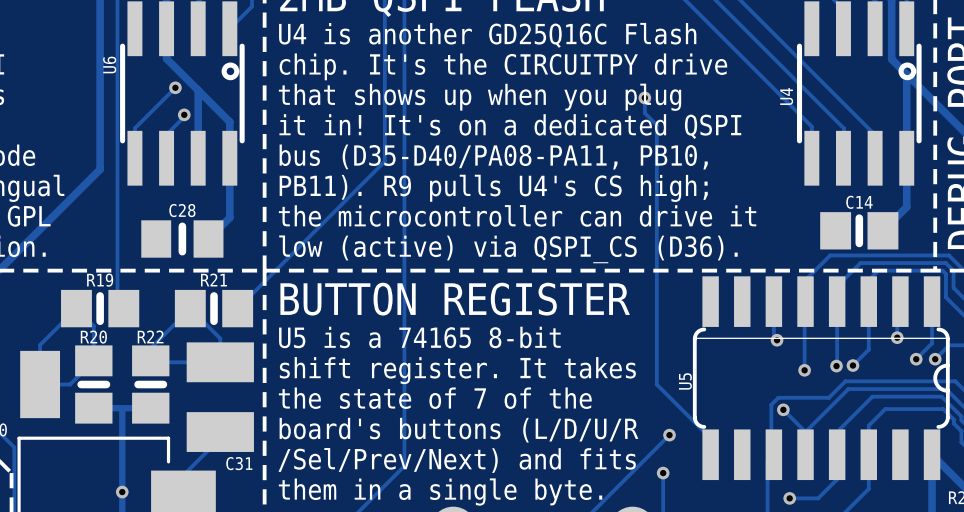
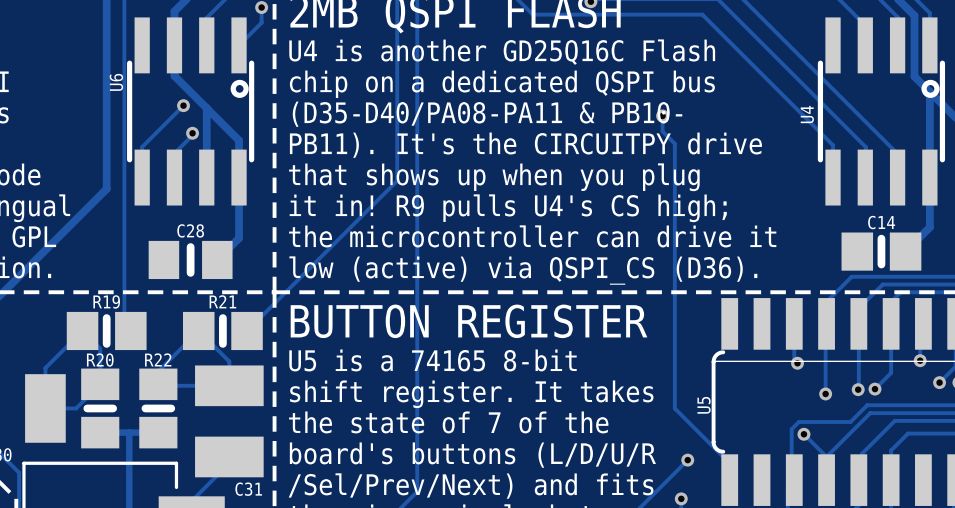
text: chip. It's the CIRCUITPY drive (503, 66) -> chip on a dedicated QSPI bus (502, 84)
text: that shows up when you plug (480, 97) -> (D35-D40/PA08-PA11 & PB10- (487, 114)
text: it in! It's on a dedicated QSPI (510, 126) -> PB11). It's the CIRCUITPY drive (525, 145)
text: bus (D35-D40/PA08-PA11, PB10, (493, 157) -> that shows up when you plug (494, 177)
text: PB11). R9 pulls U4's CS high; (493, 188) -> it in! R9 pulls U4's CS high; (508, 208)

